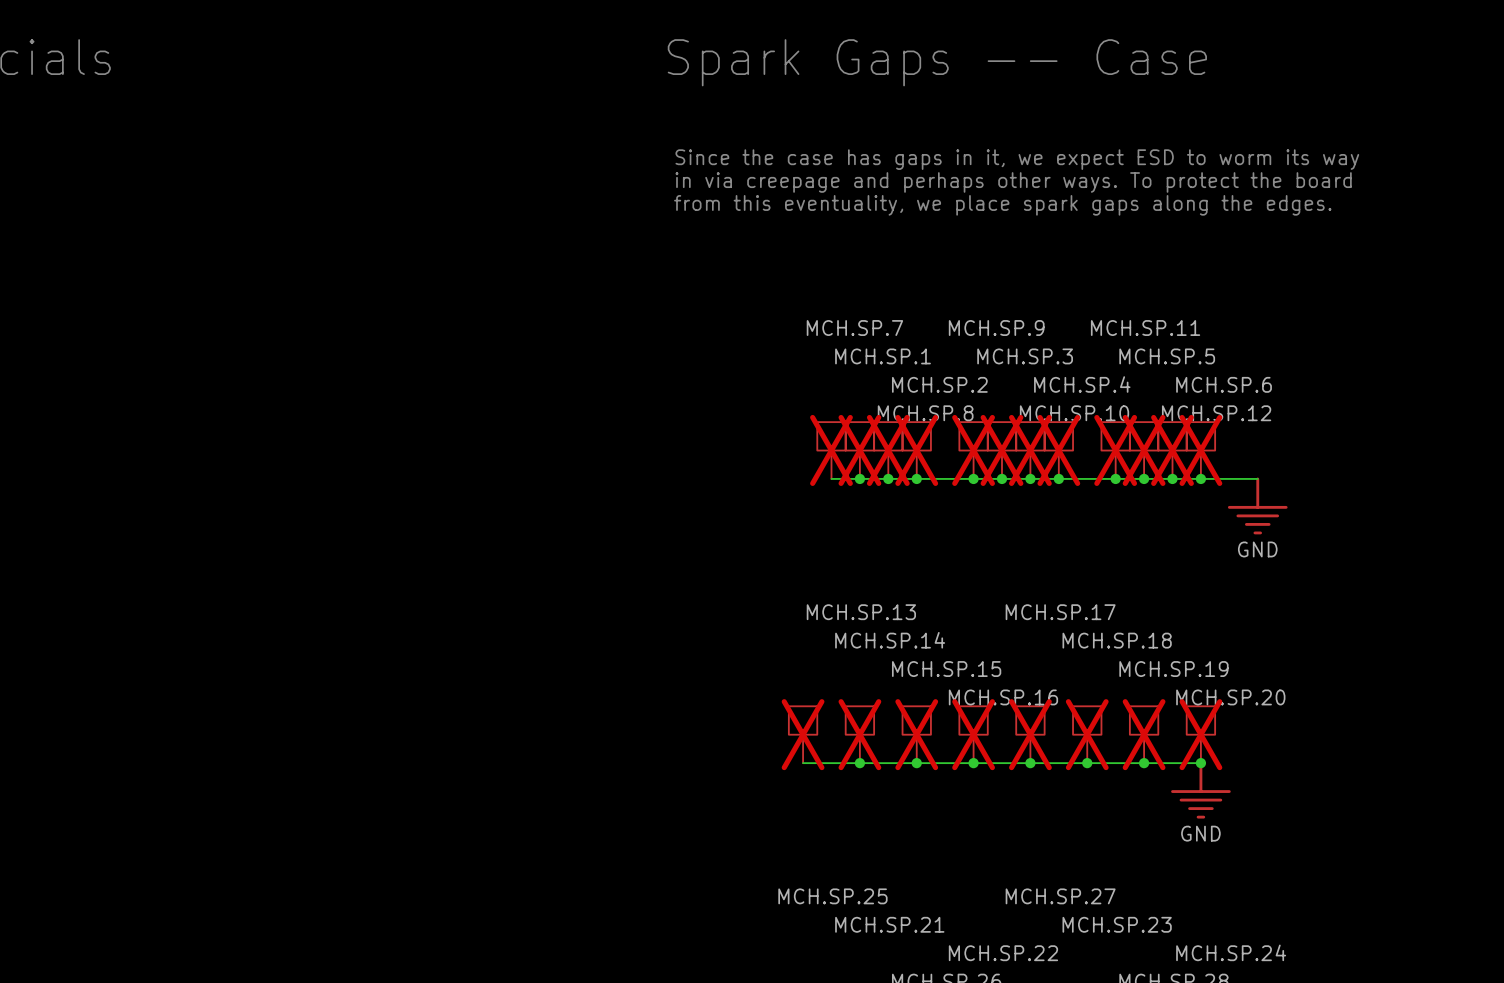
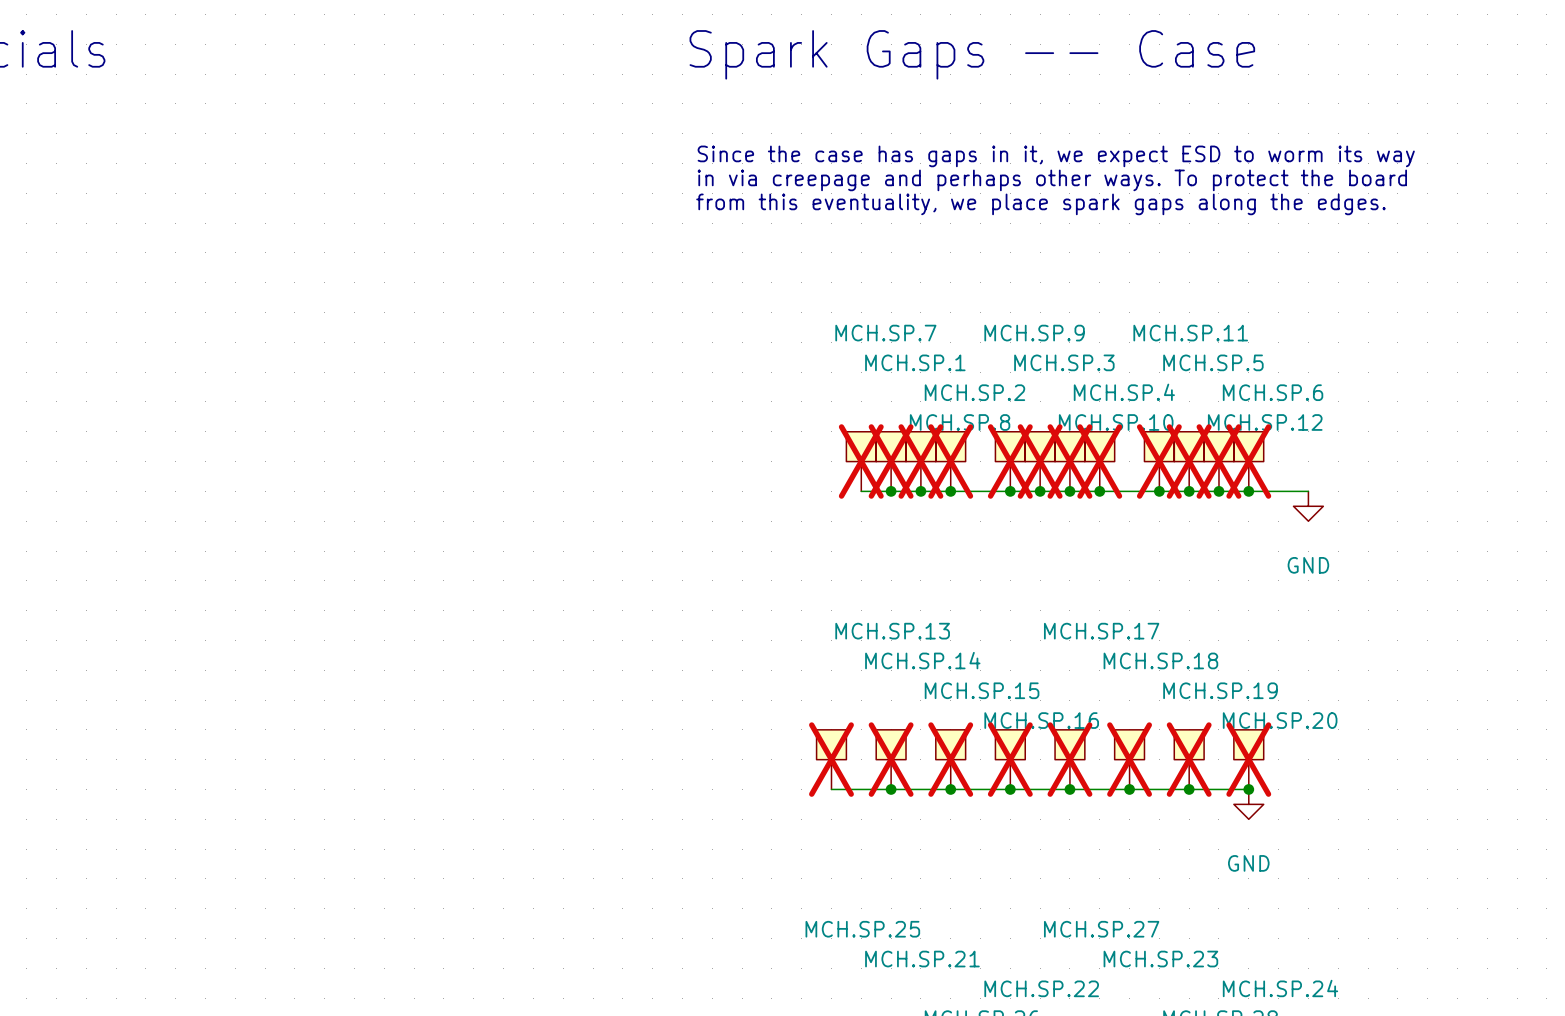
power symbol: none -> GND (1308, 506)
power symbol: GND (1257, 505) -> none
power symbol: none -> GND (1248, 804)
power symbol: GND (1200, 790) -> none

